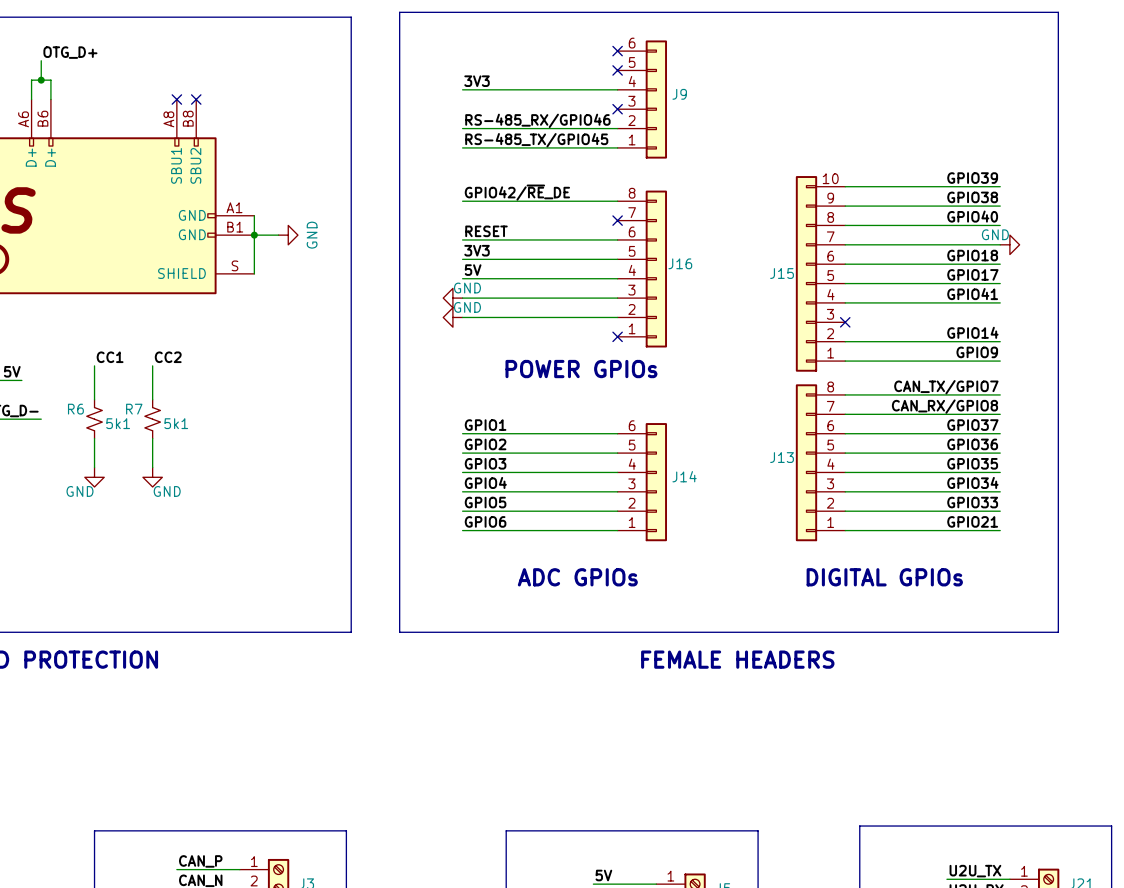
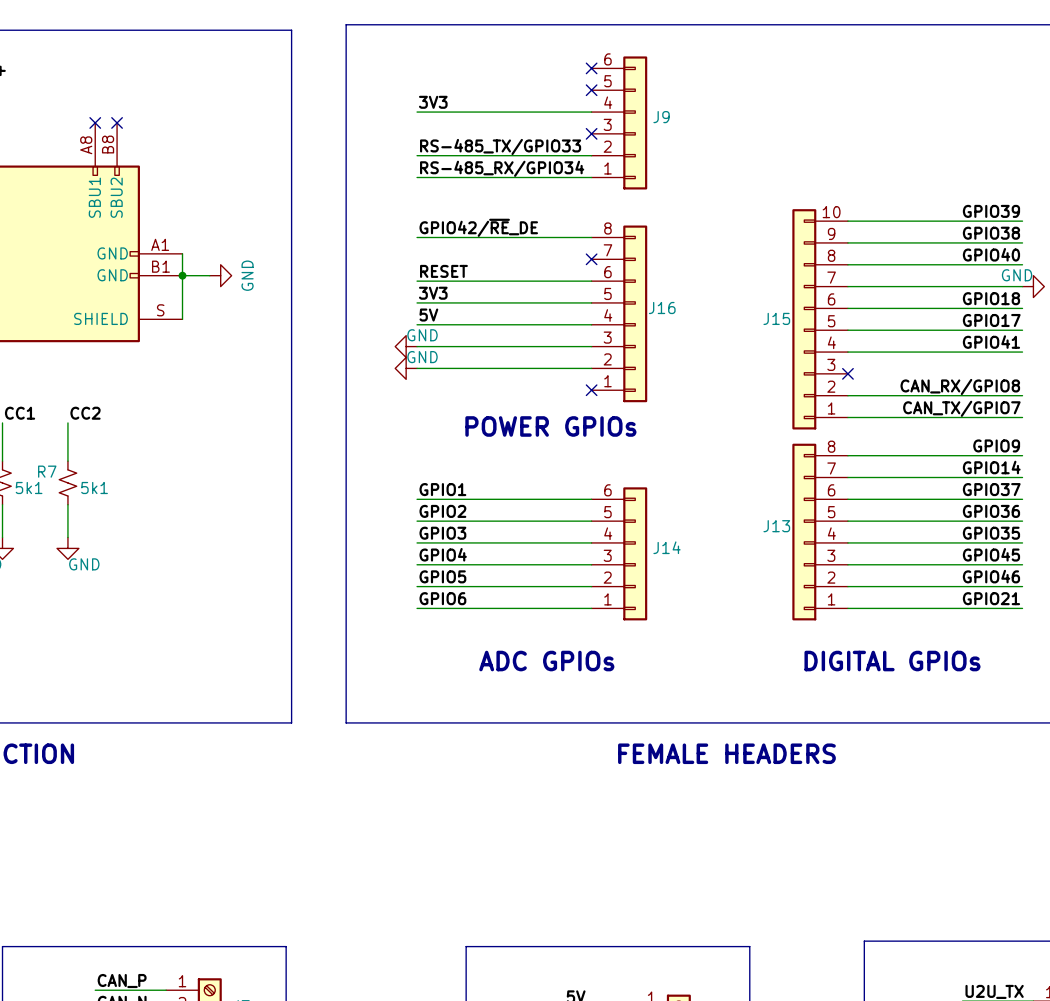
label: RS-485_RX/GPIO46 (537, 120) -> RS-485_TX/GPIO33 (500, 146)
label: RS-485_TX/GPIO45 (536, 140) -> RS-485_RX/GPIO34 (502, 168)
label: GPIO14 (972, 332) -> CAN_RX/GPIO8 (960, 386)
label: GPIO9 (977, 352) -> CAN_TX/GPIO7 (961, 408)
label: CAN_TX/GPIO7 (946, 387) -> GPIO9 (996, 445)
label: CAN_RX/GPIO8 (944, 406) -> GPIO14 (991, 467)
label: GPIO34 (972, 482) -> GPIO45 (991, 554)
label: GPIO33 (972, 502) -> GPIO46 (991, 576)

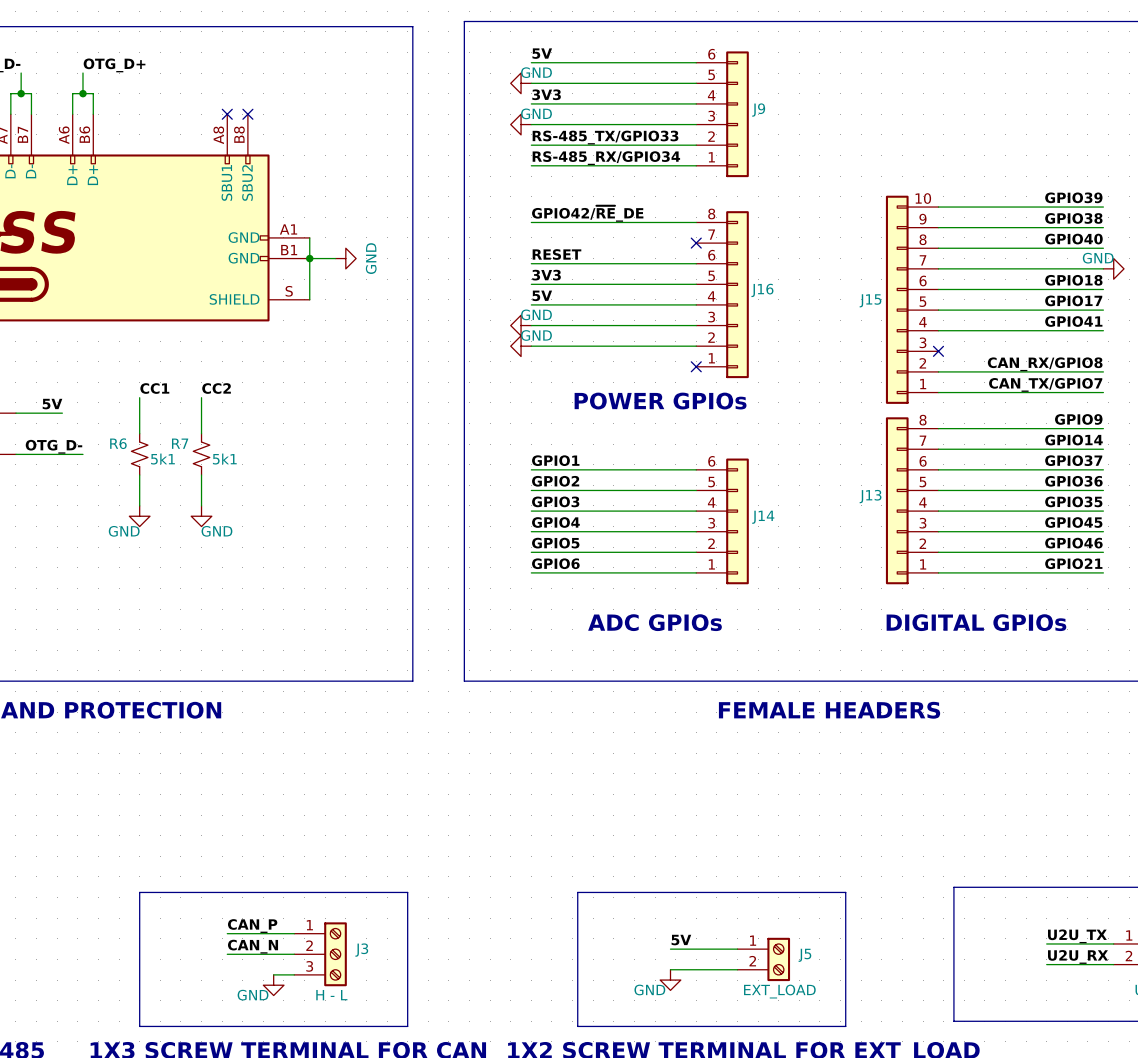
label: none -> 5V (542, 53)
wire: none -> (531, 62) (696, 62)
no-connect mark: (591, 68) -> none
power symbol: none -> GND (521, 83)
wire: none -> (531, 83) (696, 83)
no-connect mark: (591, 90) -> none
power symbol: none -> GND (521, 124)
wire: none -> (531, 124) (696, 124)
no-connect mark: (591, 133) -> none

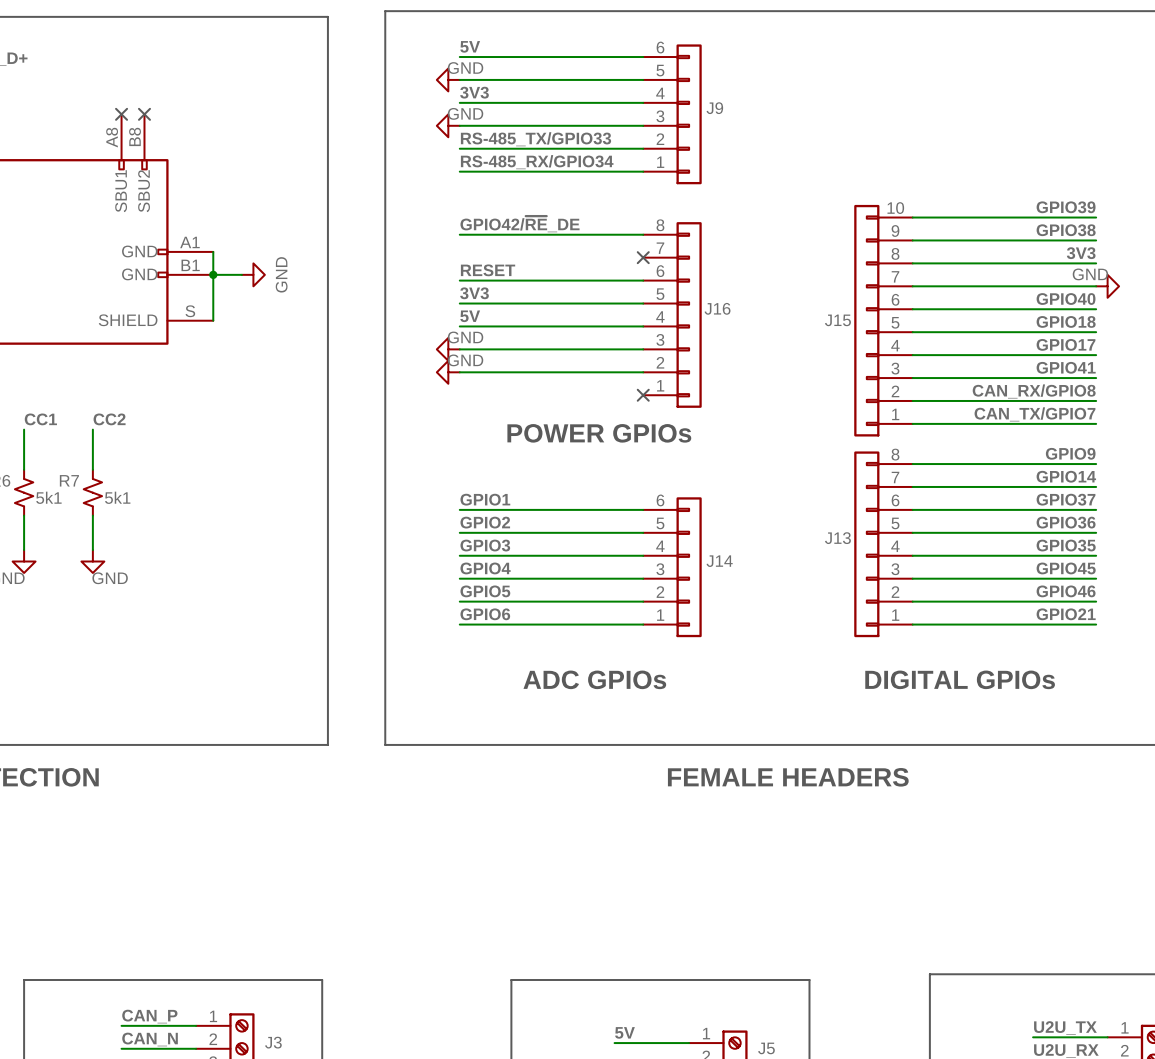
label: GPIO40 (1073, 239) -> 3V3 (1081, 253)
label: GPIO18 (1073, 280) -> GPIO40 (1066, 299)
label: GPIO17 (1073, 300) -> GPIO18 (1066, 321)
label: GPIO41 (1073, 321) -> GPIO17 (1066, 344)
label: none -> GPIO41 (1066, 367)
wire: none -> (912, 378) (1096, 378)
no-connect mark: (938, 351) -> none

